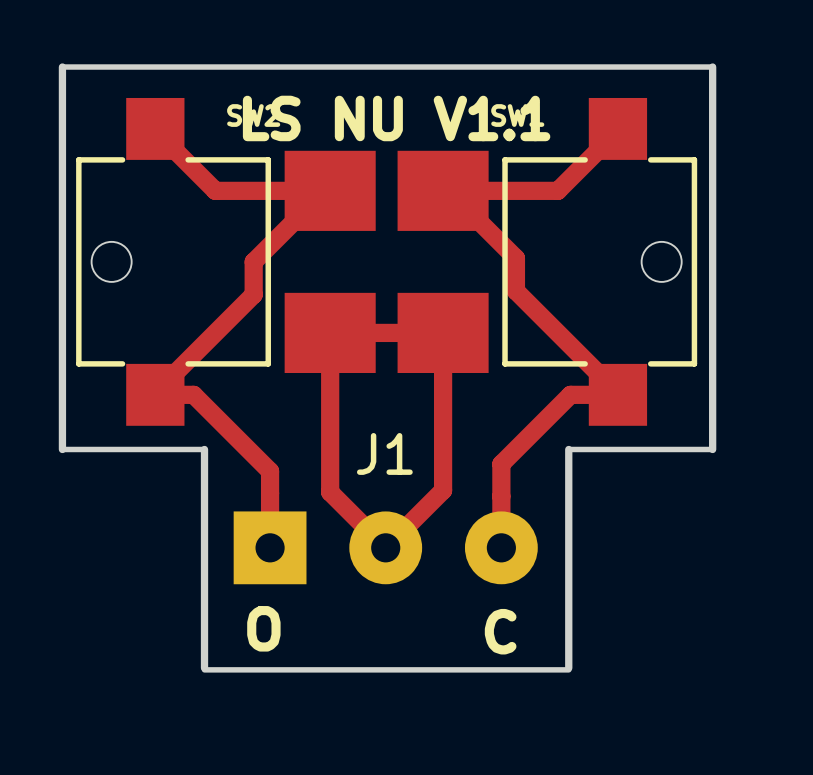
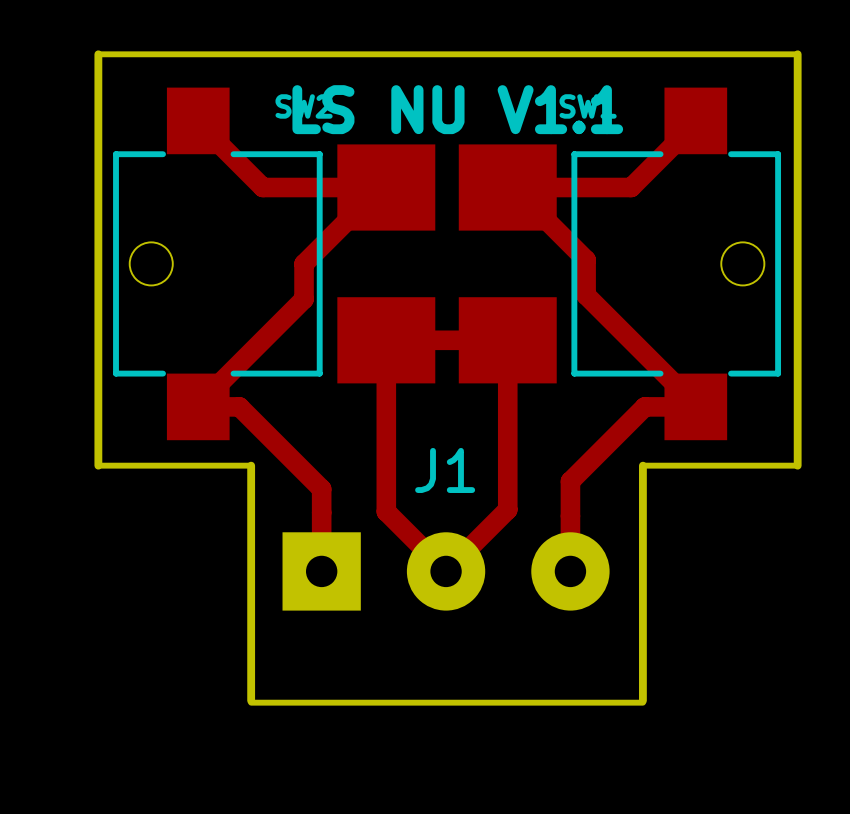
text: O (263, 628) -> none
text: C (500, 631) -> none

